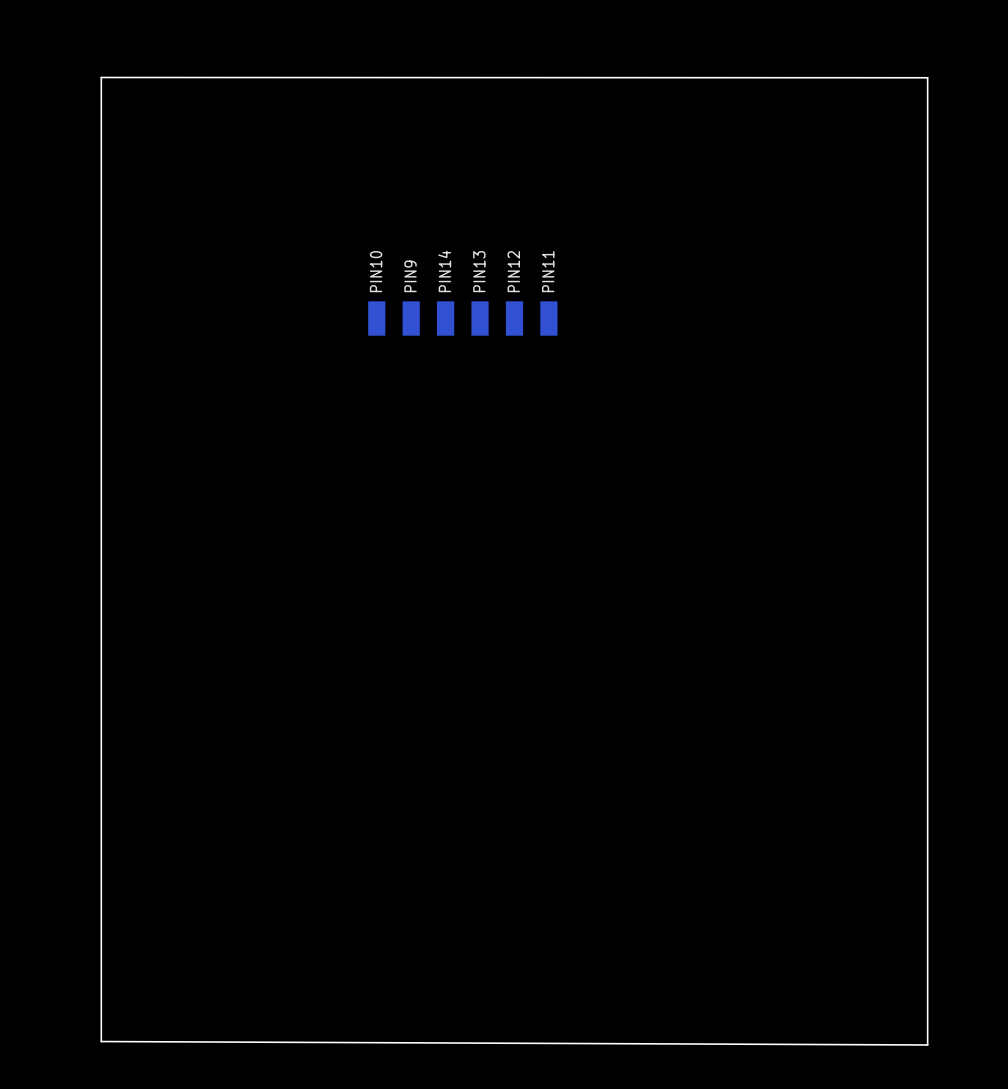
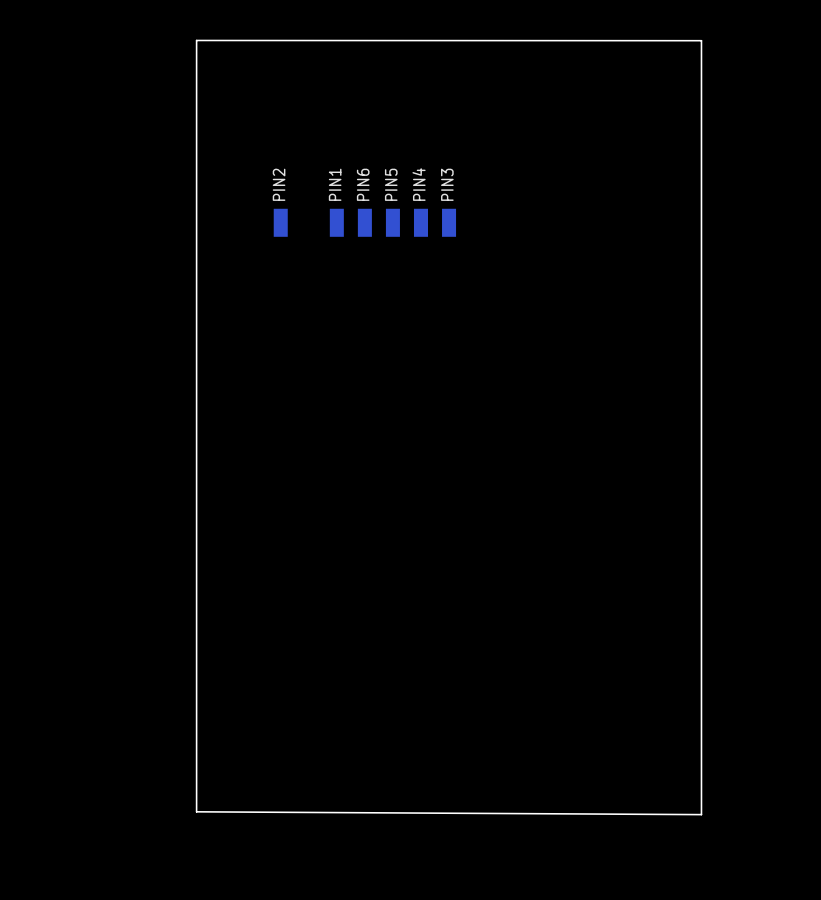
board edge: (101, 77) (101, 1041) (927, 1044) (927, 77) (101, 77) -> (196, 40) (701, 40) (701, 814) (196, 811) (196, 40)
PIN14 name: PIN14 (444, 271) -> PIN6 (363, 184)
PIN13 name: PIN13 (479, 271) -> PIN5 (391, 184)
PIN12 name: PIN12 (513, 271) -> PIN4 (419, 184)
PIN11 name: PIN11 (548, 271) -> PIN3 (447, 184)
PIN9 name: PIN9 (410, 276) -> PIN1 (335, 184)
PIN2: none -> (280, 222)
PIN10: (376, 318) -> none

